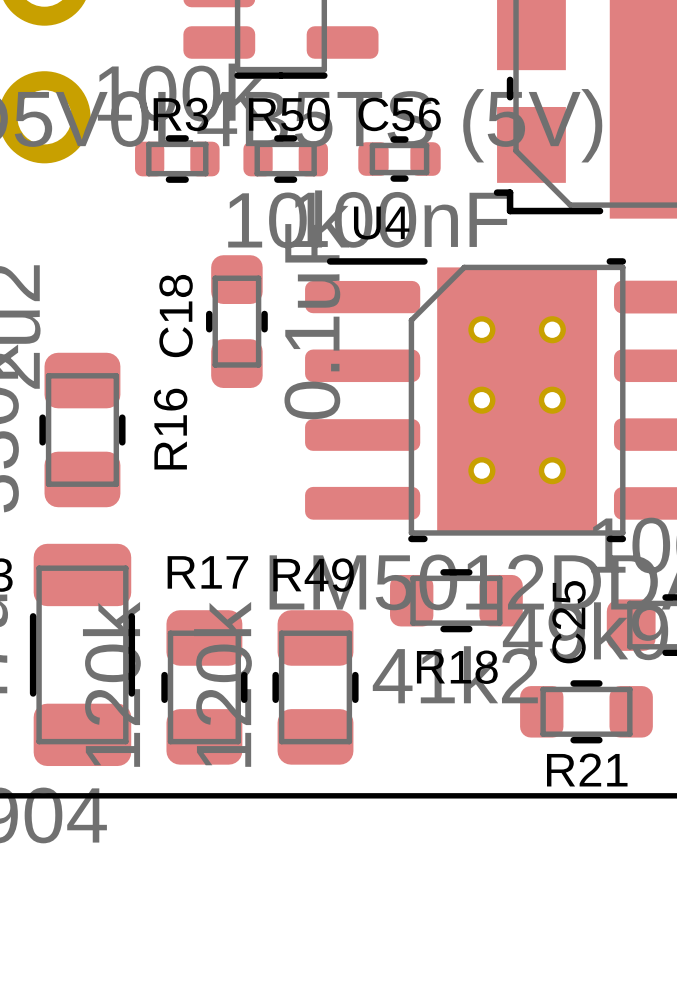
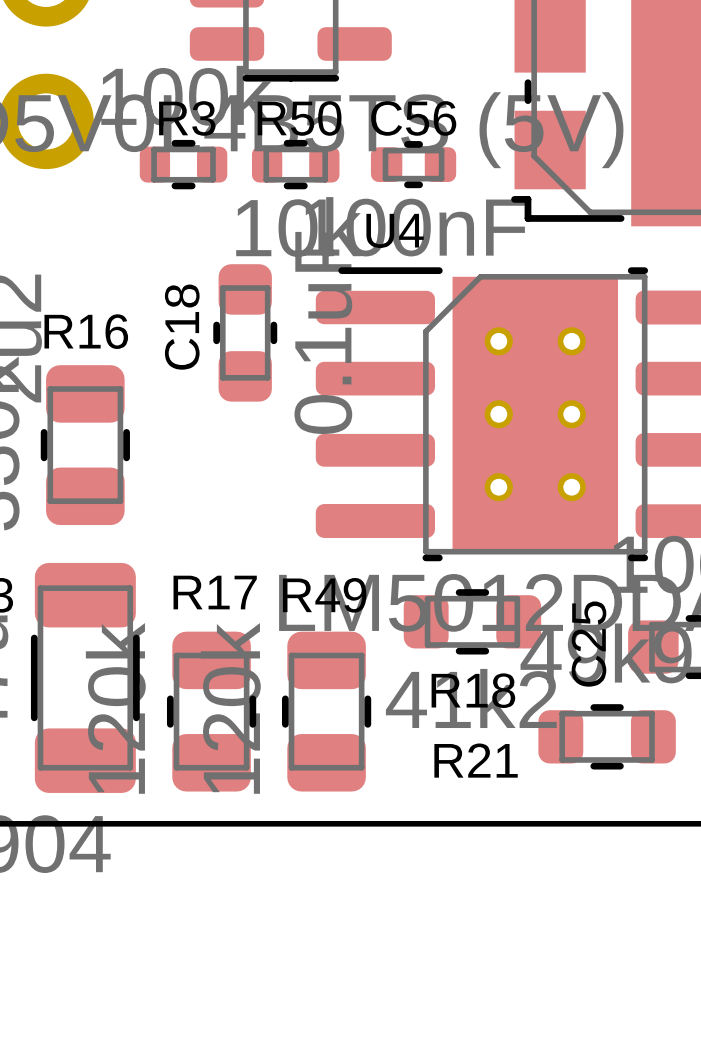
R16 name rotation: 0° (170, 429) -> 90° clockwise (86, 331)
R16 name position: R16 (170, 429) -> R16 (86, 331)
R21 name position: R21 (587, 769) -> R21 (476, 760)

